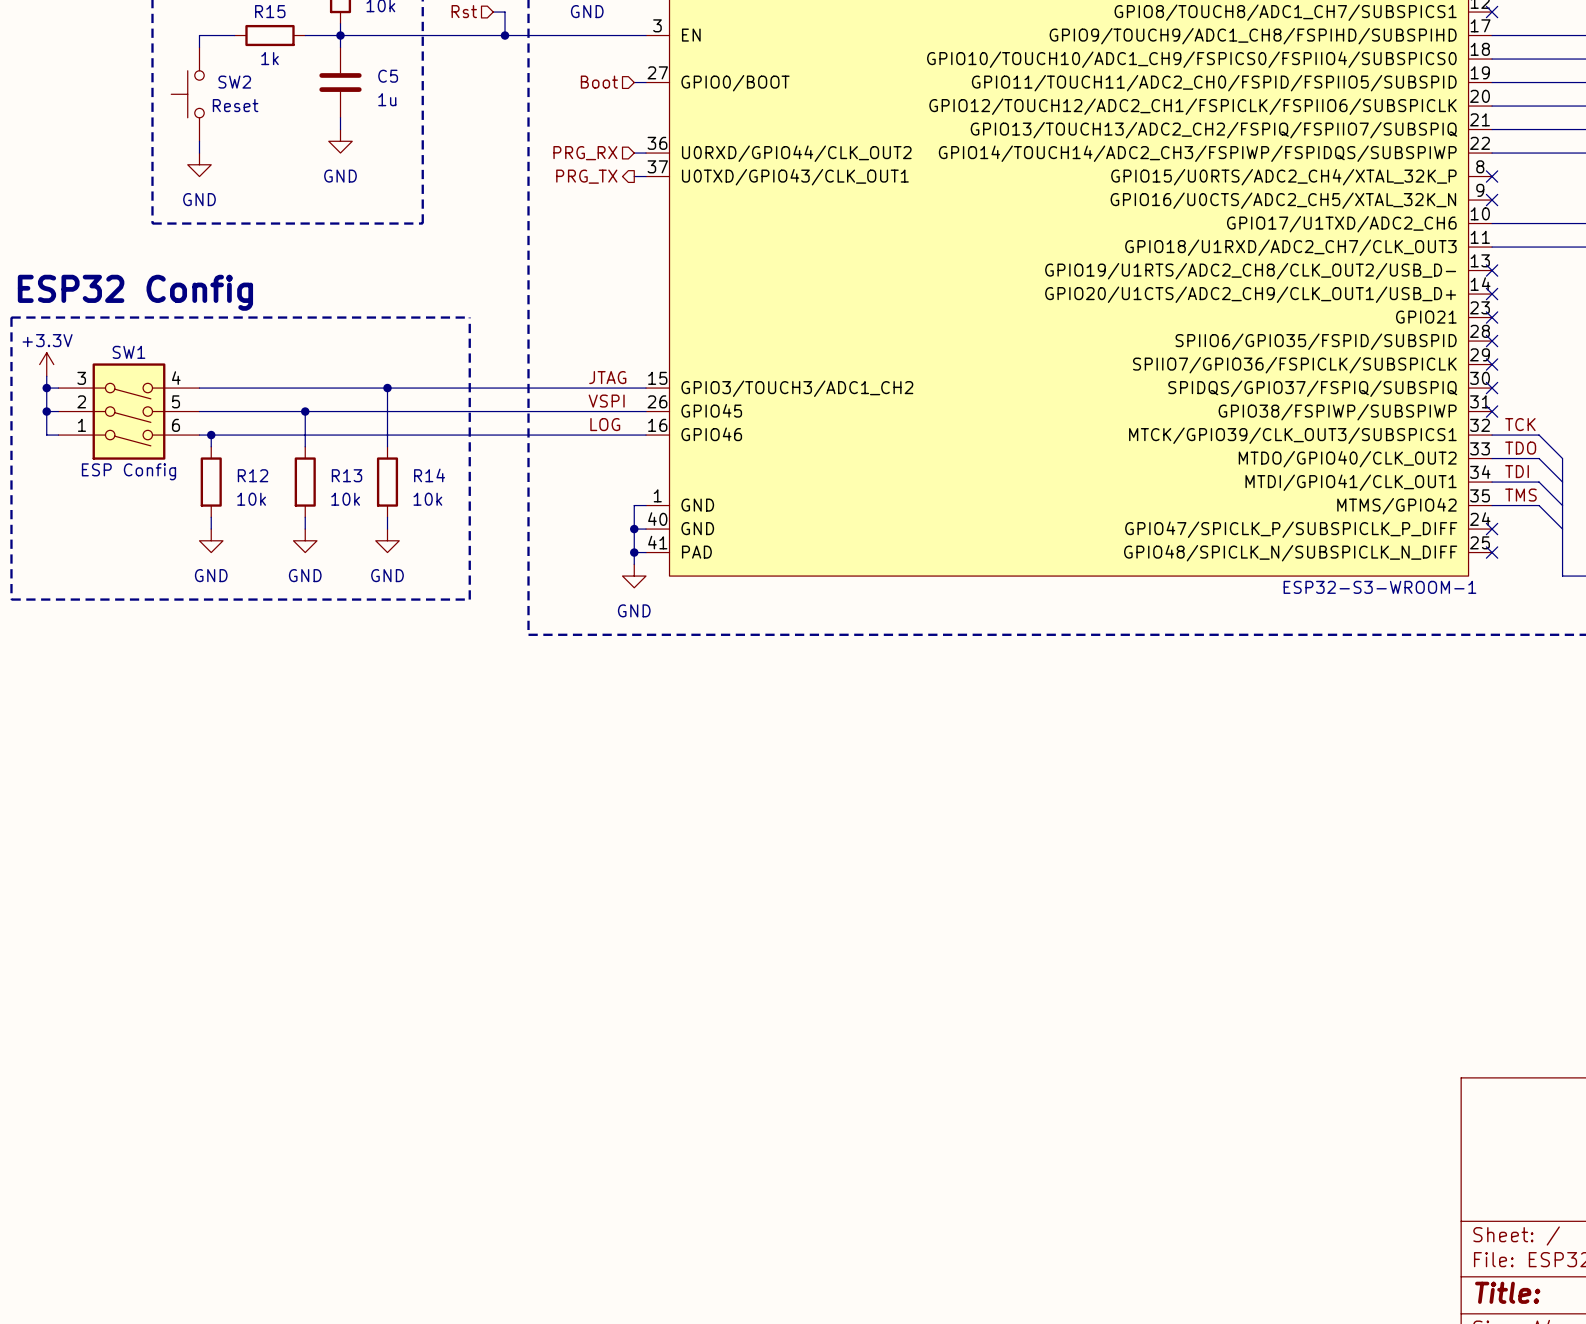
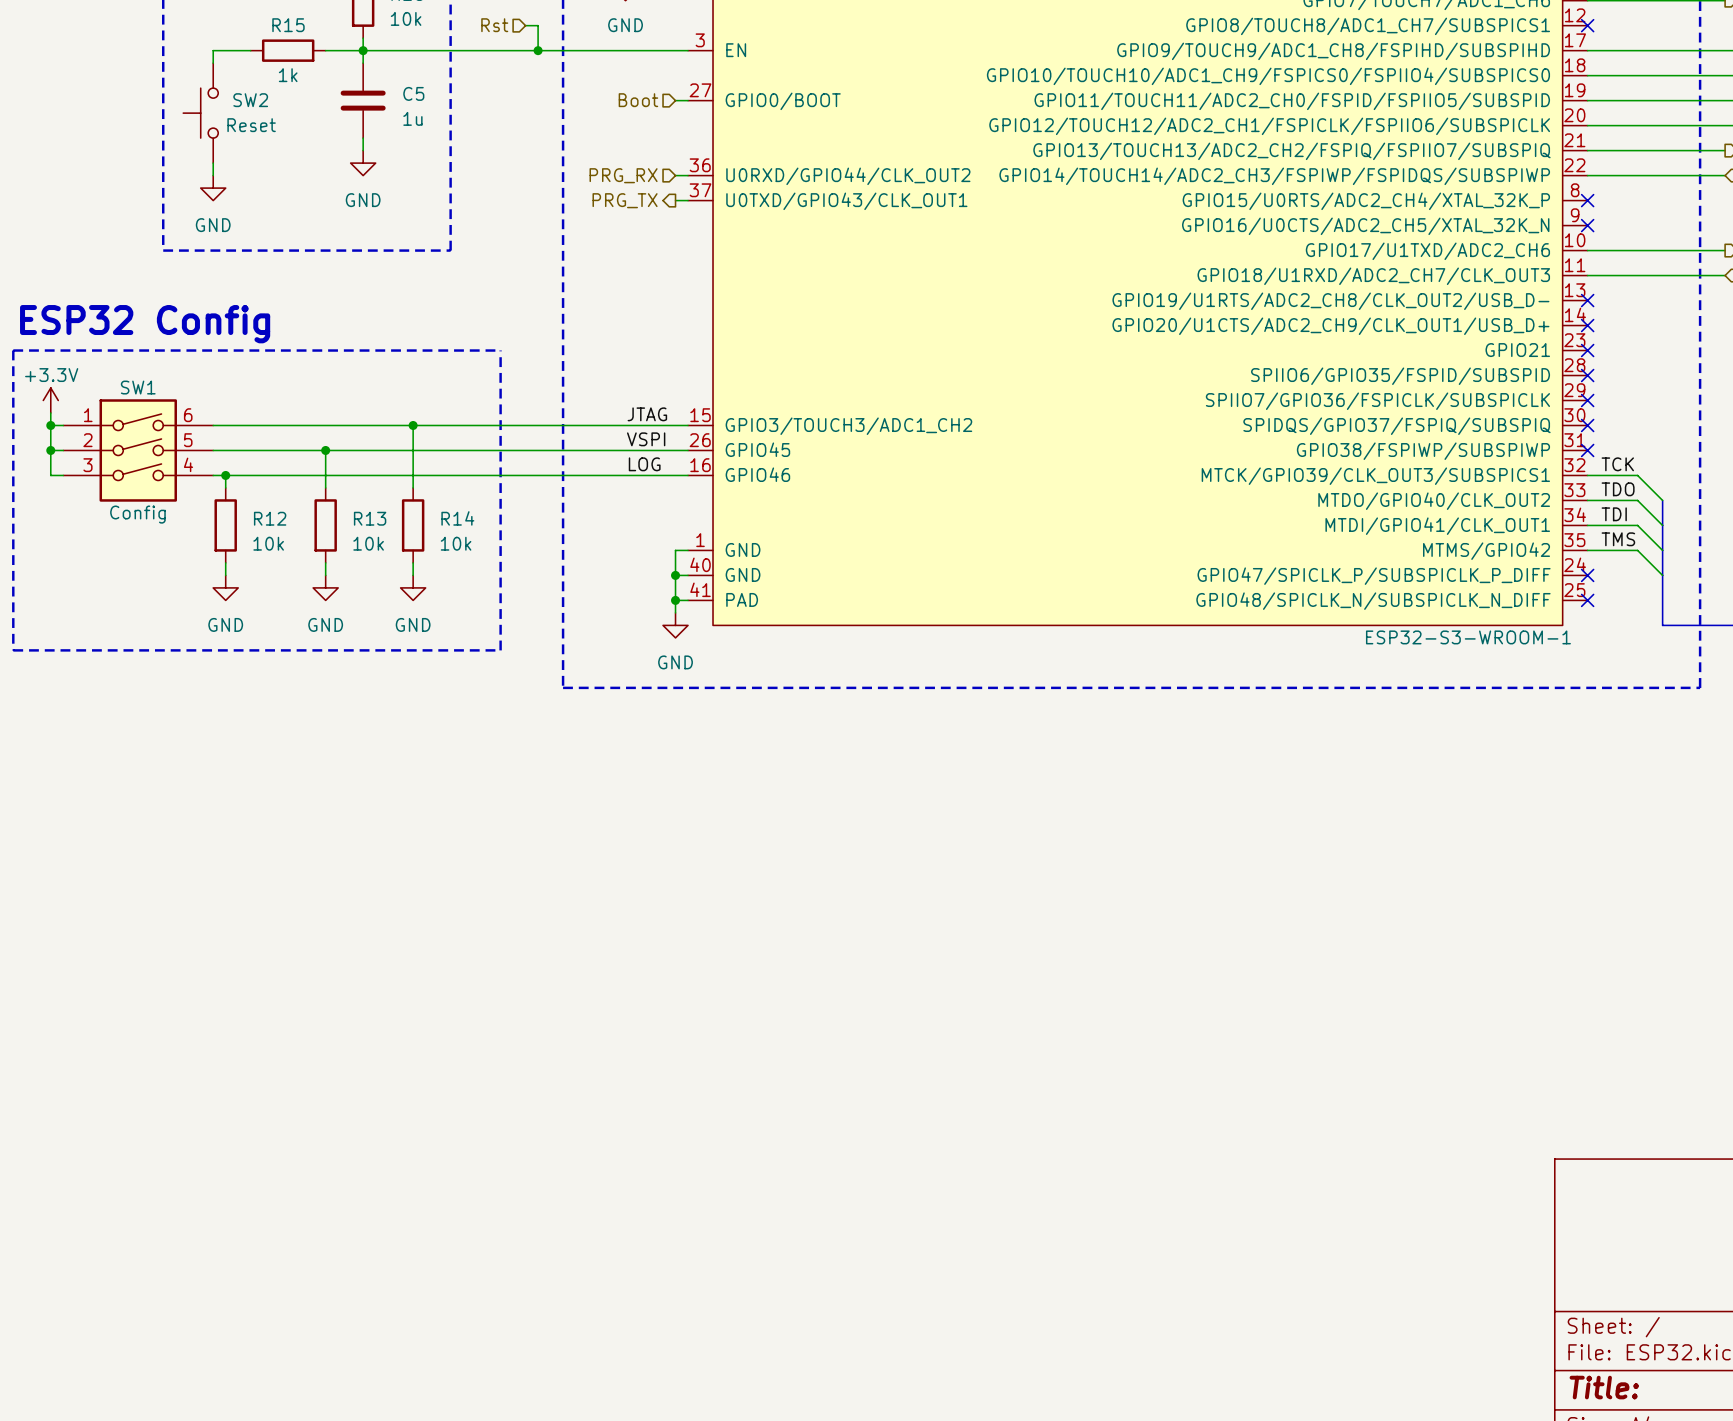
SW1 flip: as is (128, 411) -> up-down (138, 450)
SW1 value: ESP Config (128, 471) -> Config (137, 514)

